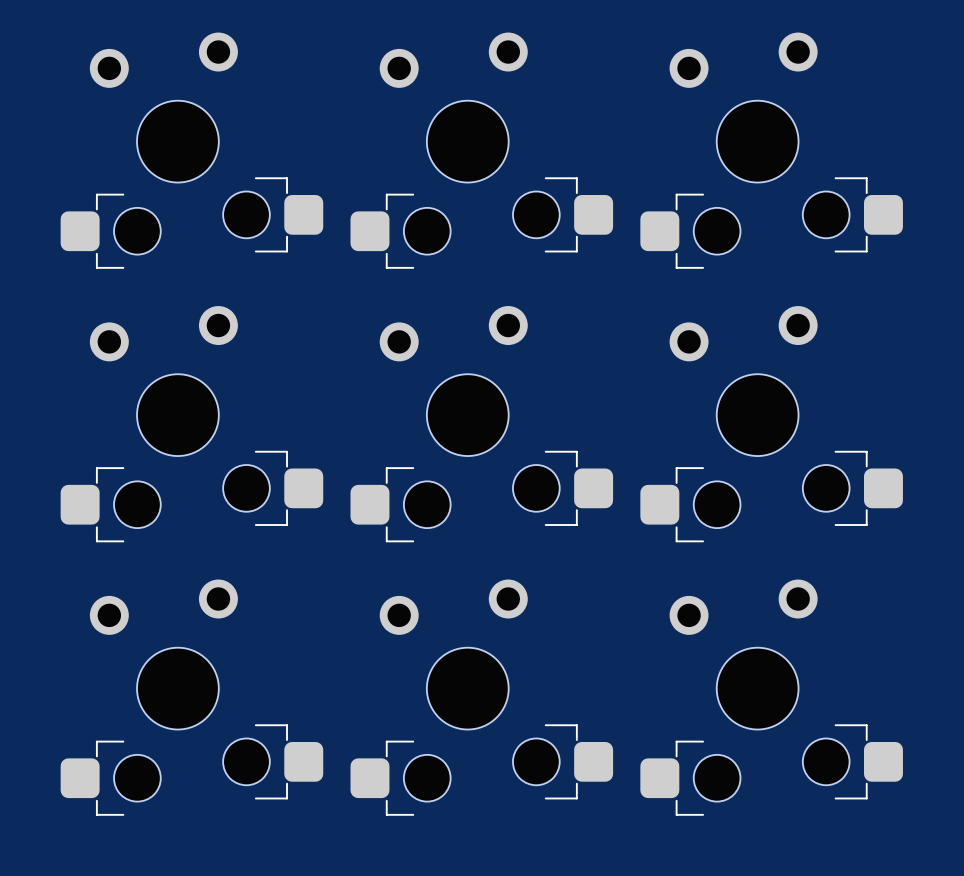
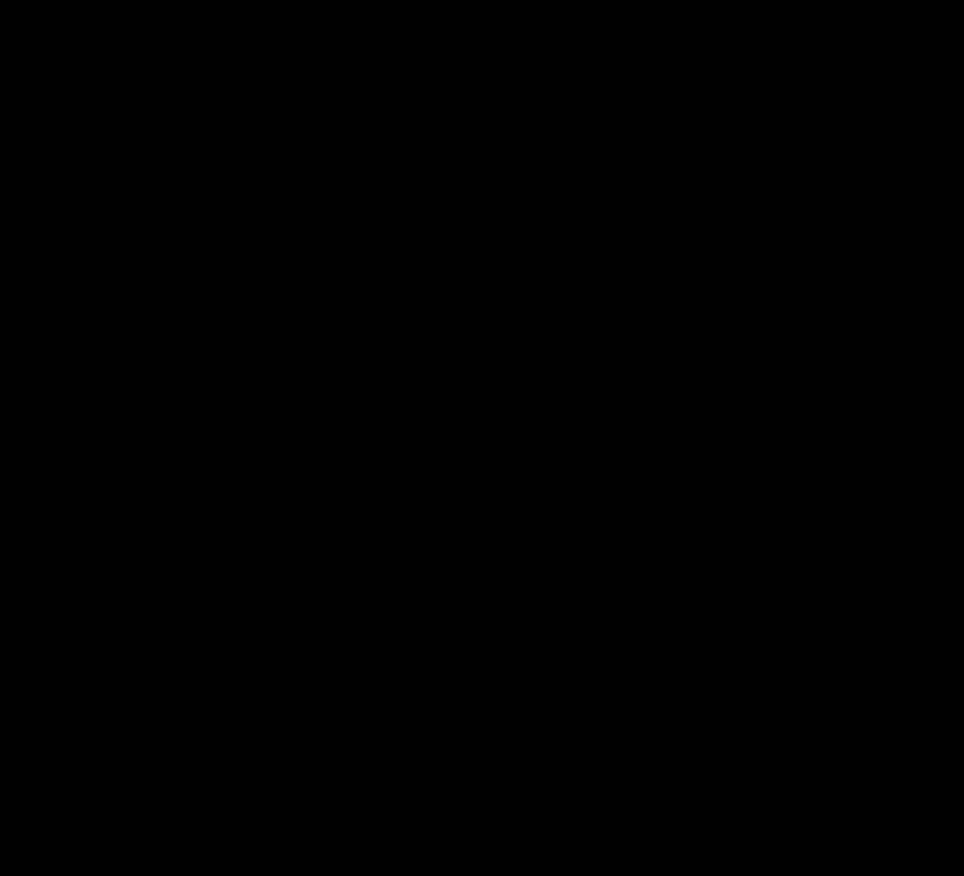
part: (191, 150) -> none
part: (481, 150) -> none
part: (771, 150) -> none
part: (191, 424) -> none
part: (481, 424) -> none
part: (771, 424) -> none
part: (191, 697) -> none
part: (481, 697) -> none
part: (771, 697) -> none

